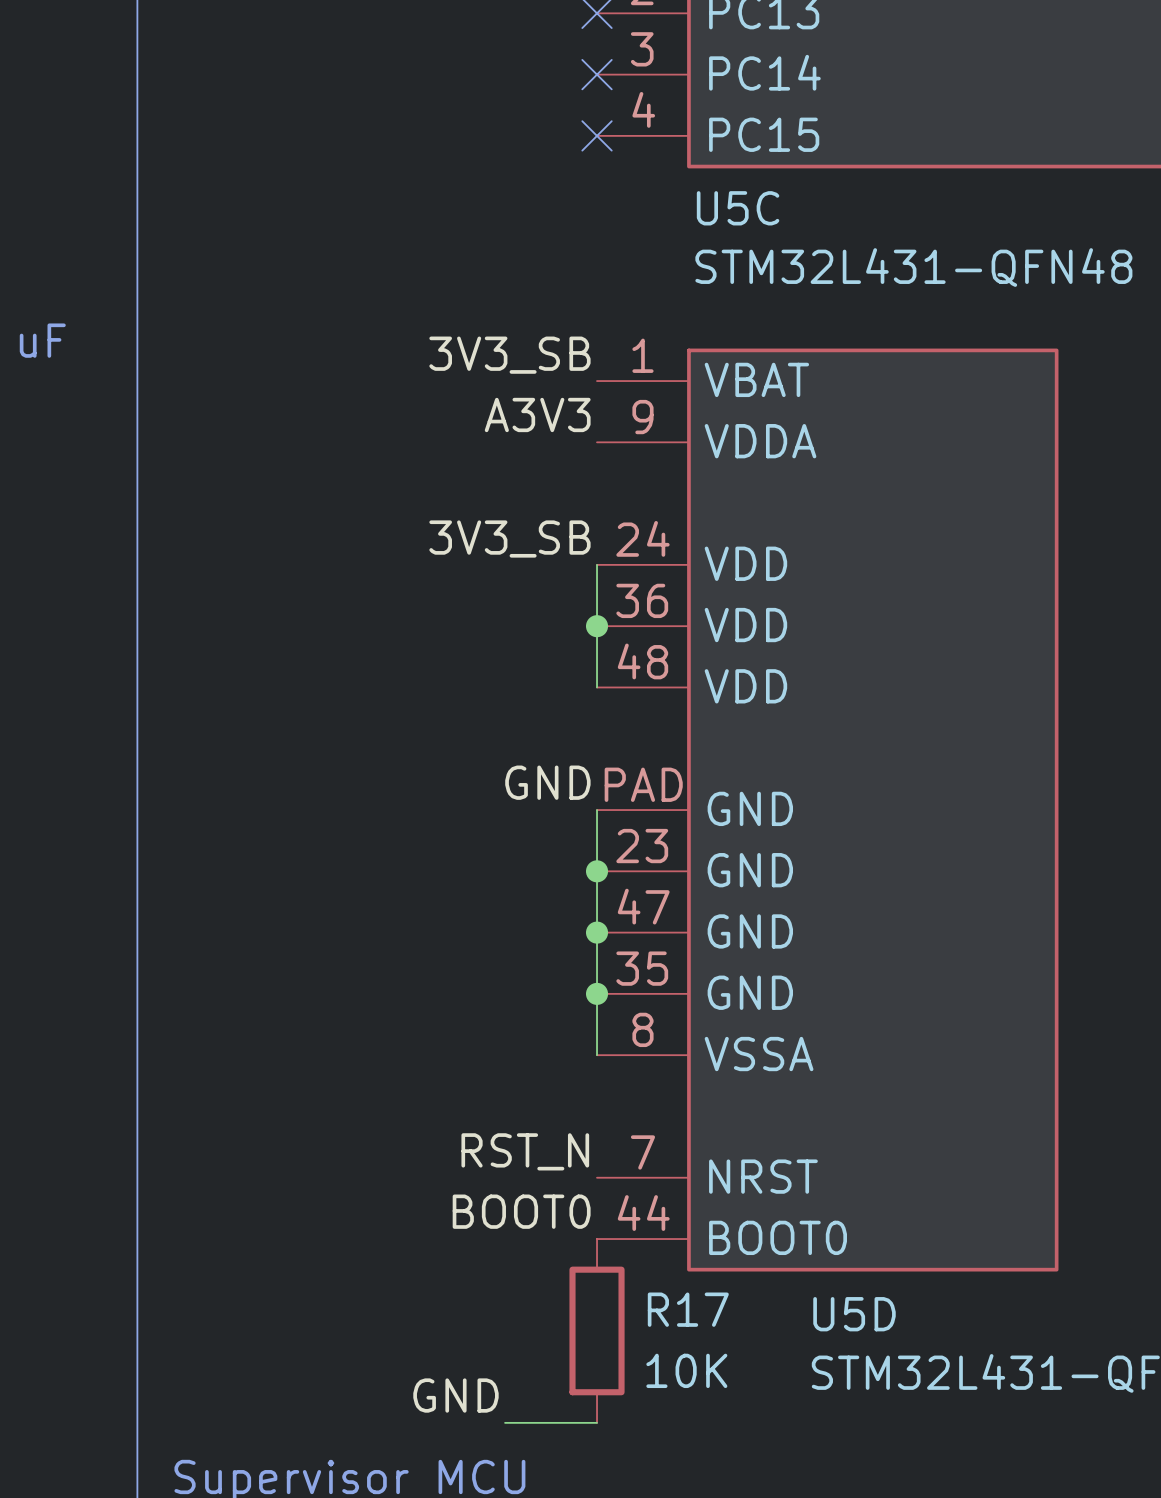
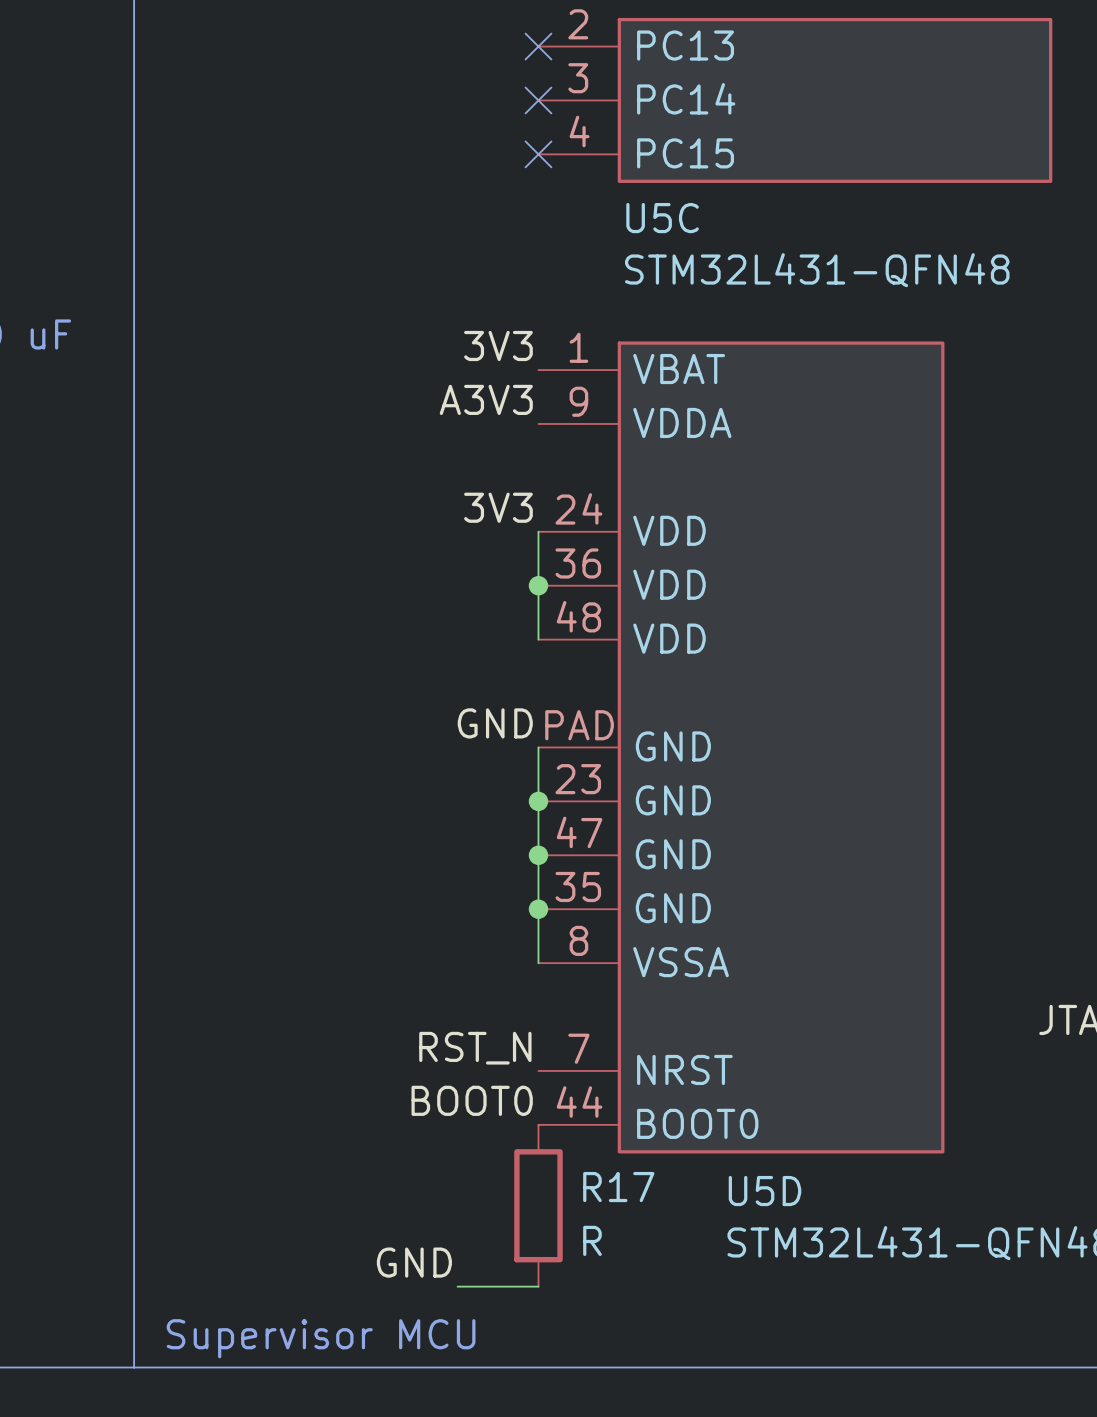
label: 3V3_SB (509, 355) -> 3V3 (498, 345)
label: 3V3_SB (509, 539) -> 3V3 (498, 507)
R17 value: 10K (686, 1370) -> R (592, 1240)

